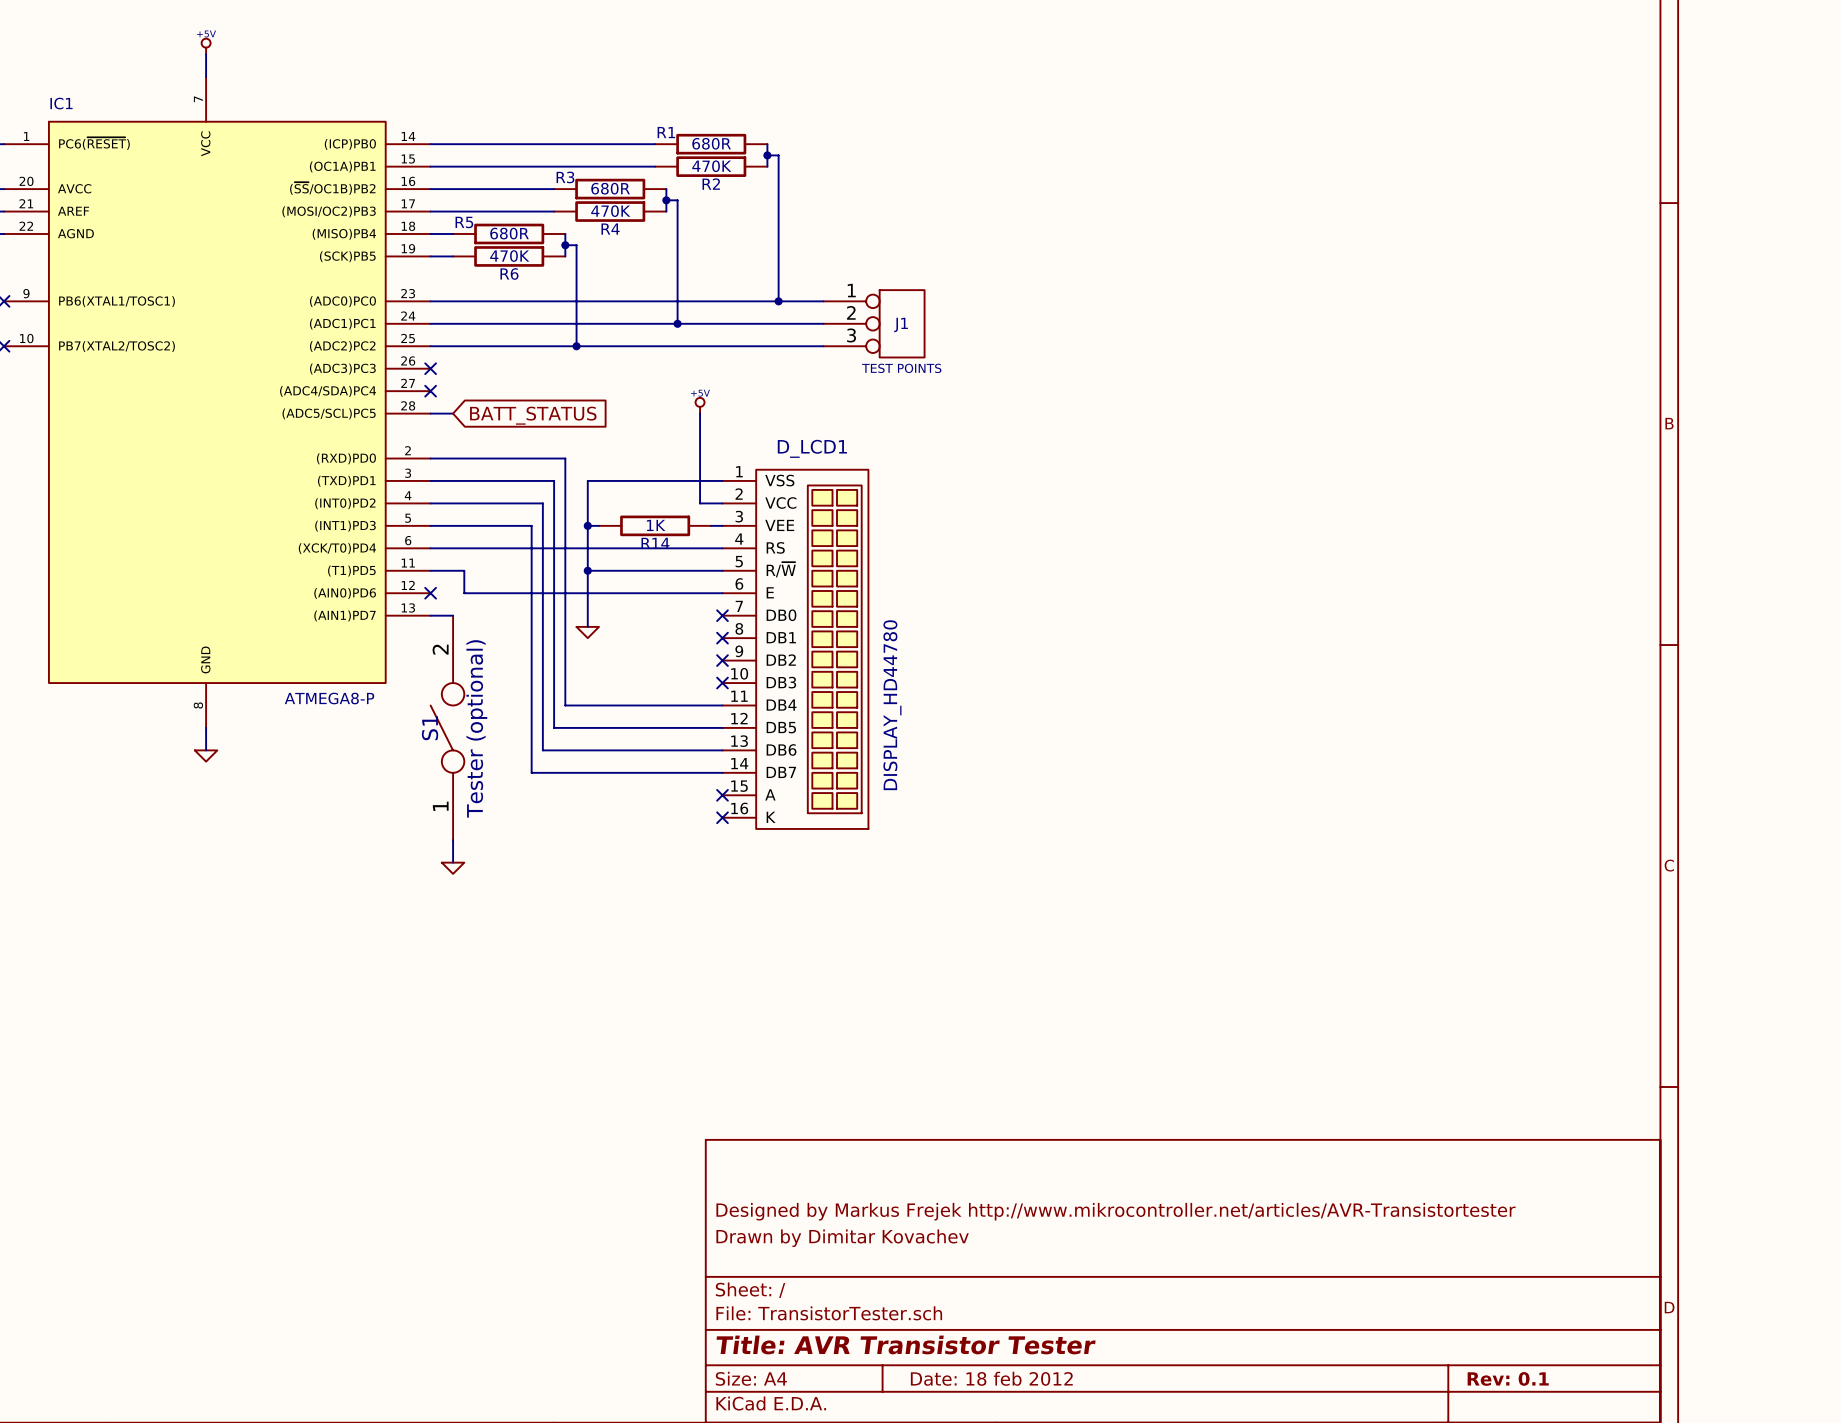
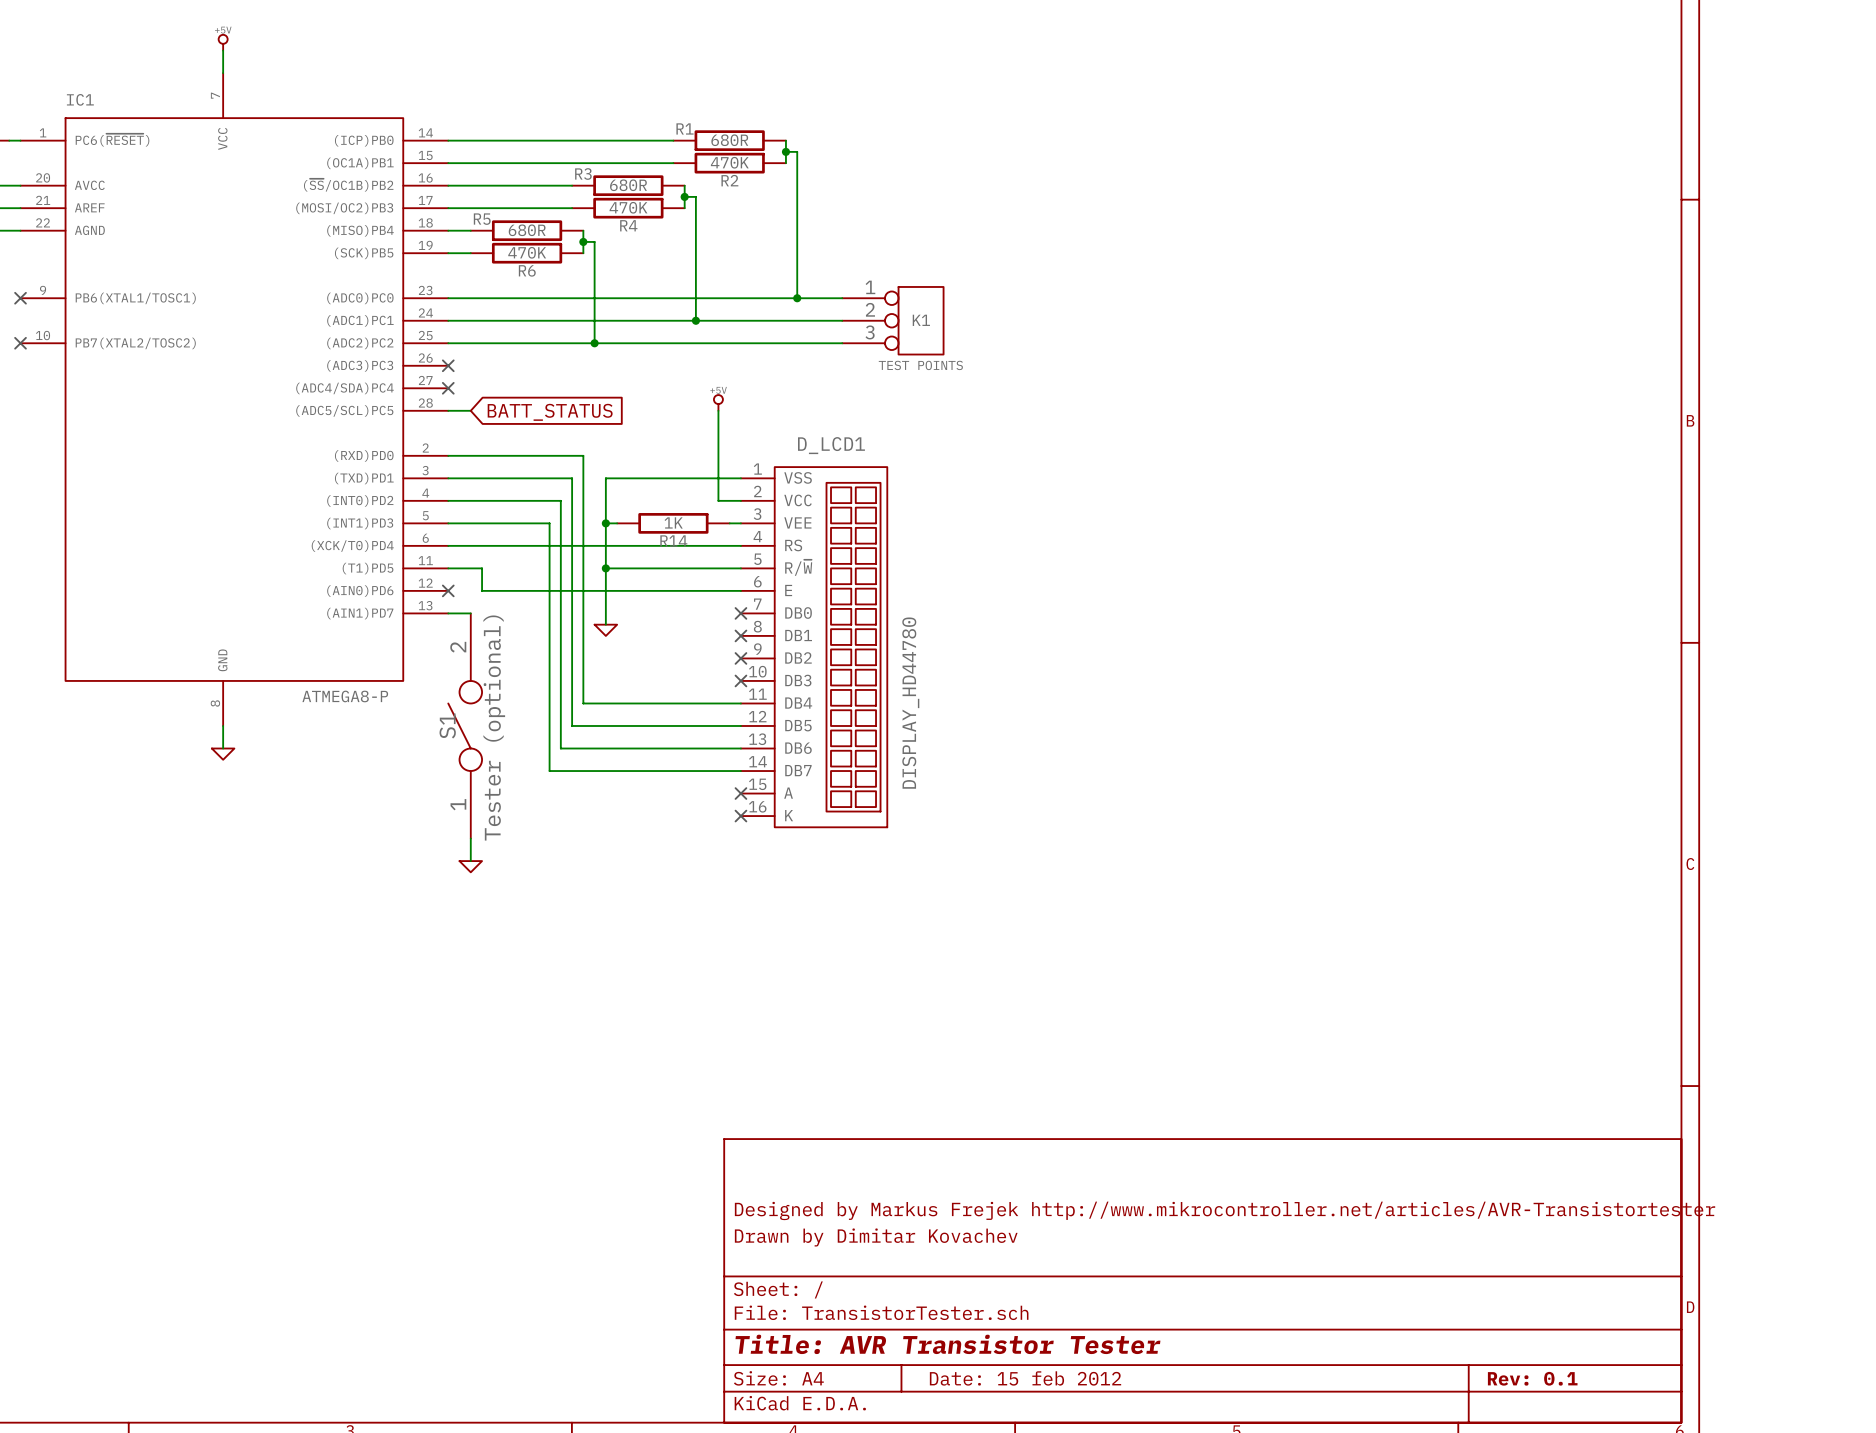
J1 name: J1 (901, 324) -> K1 (921, 320)
title block: Date: 18 feb 2012 (991, 1378) -> Date: 15 feb 2012 (1025, 1378)

